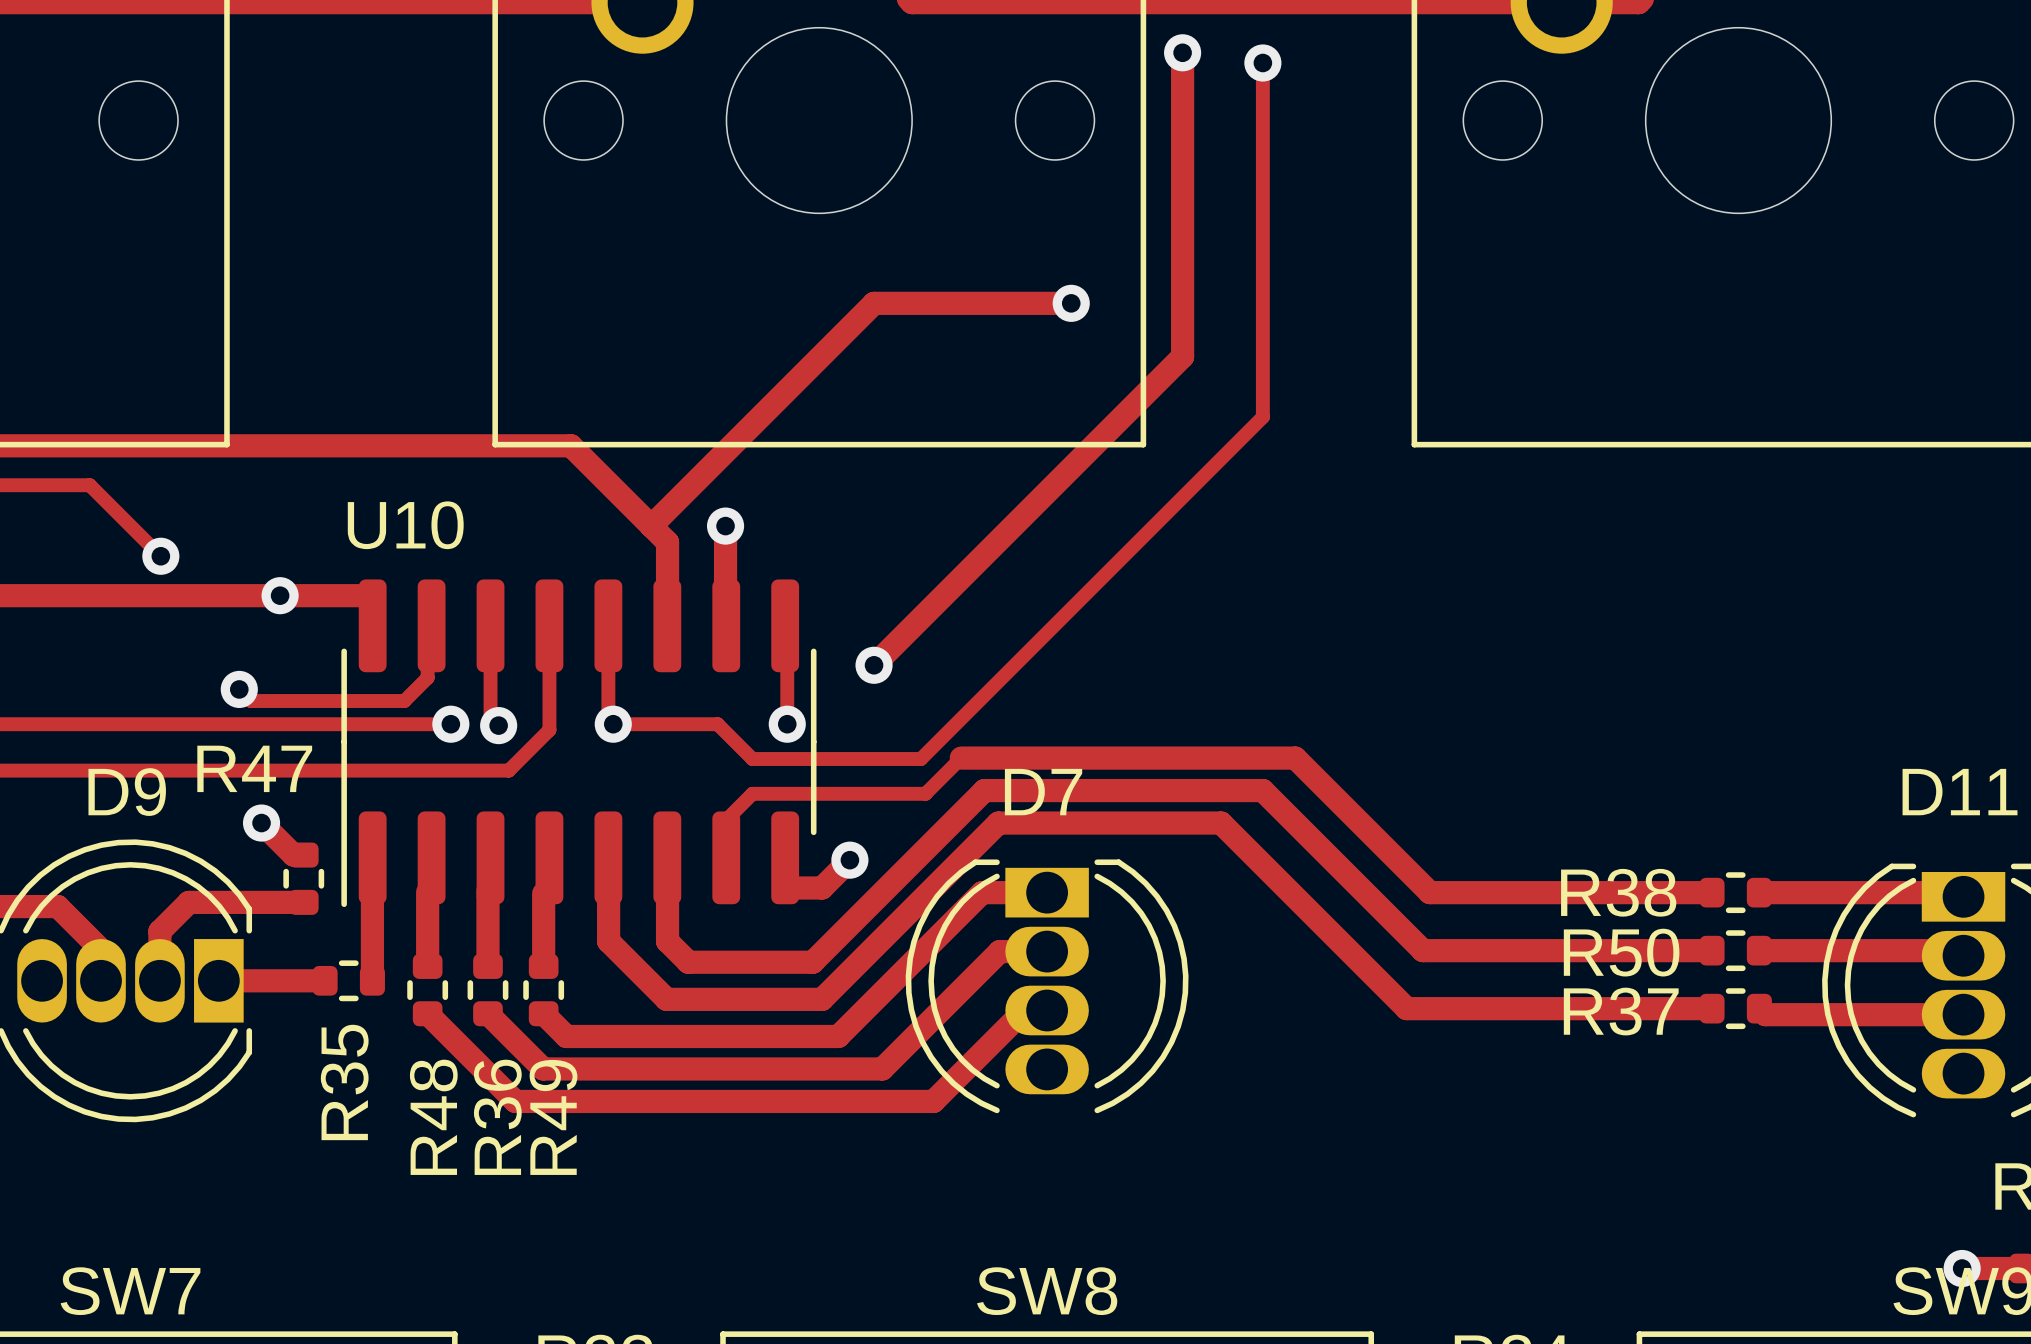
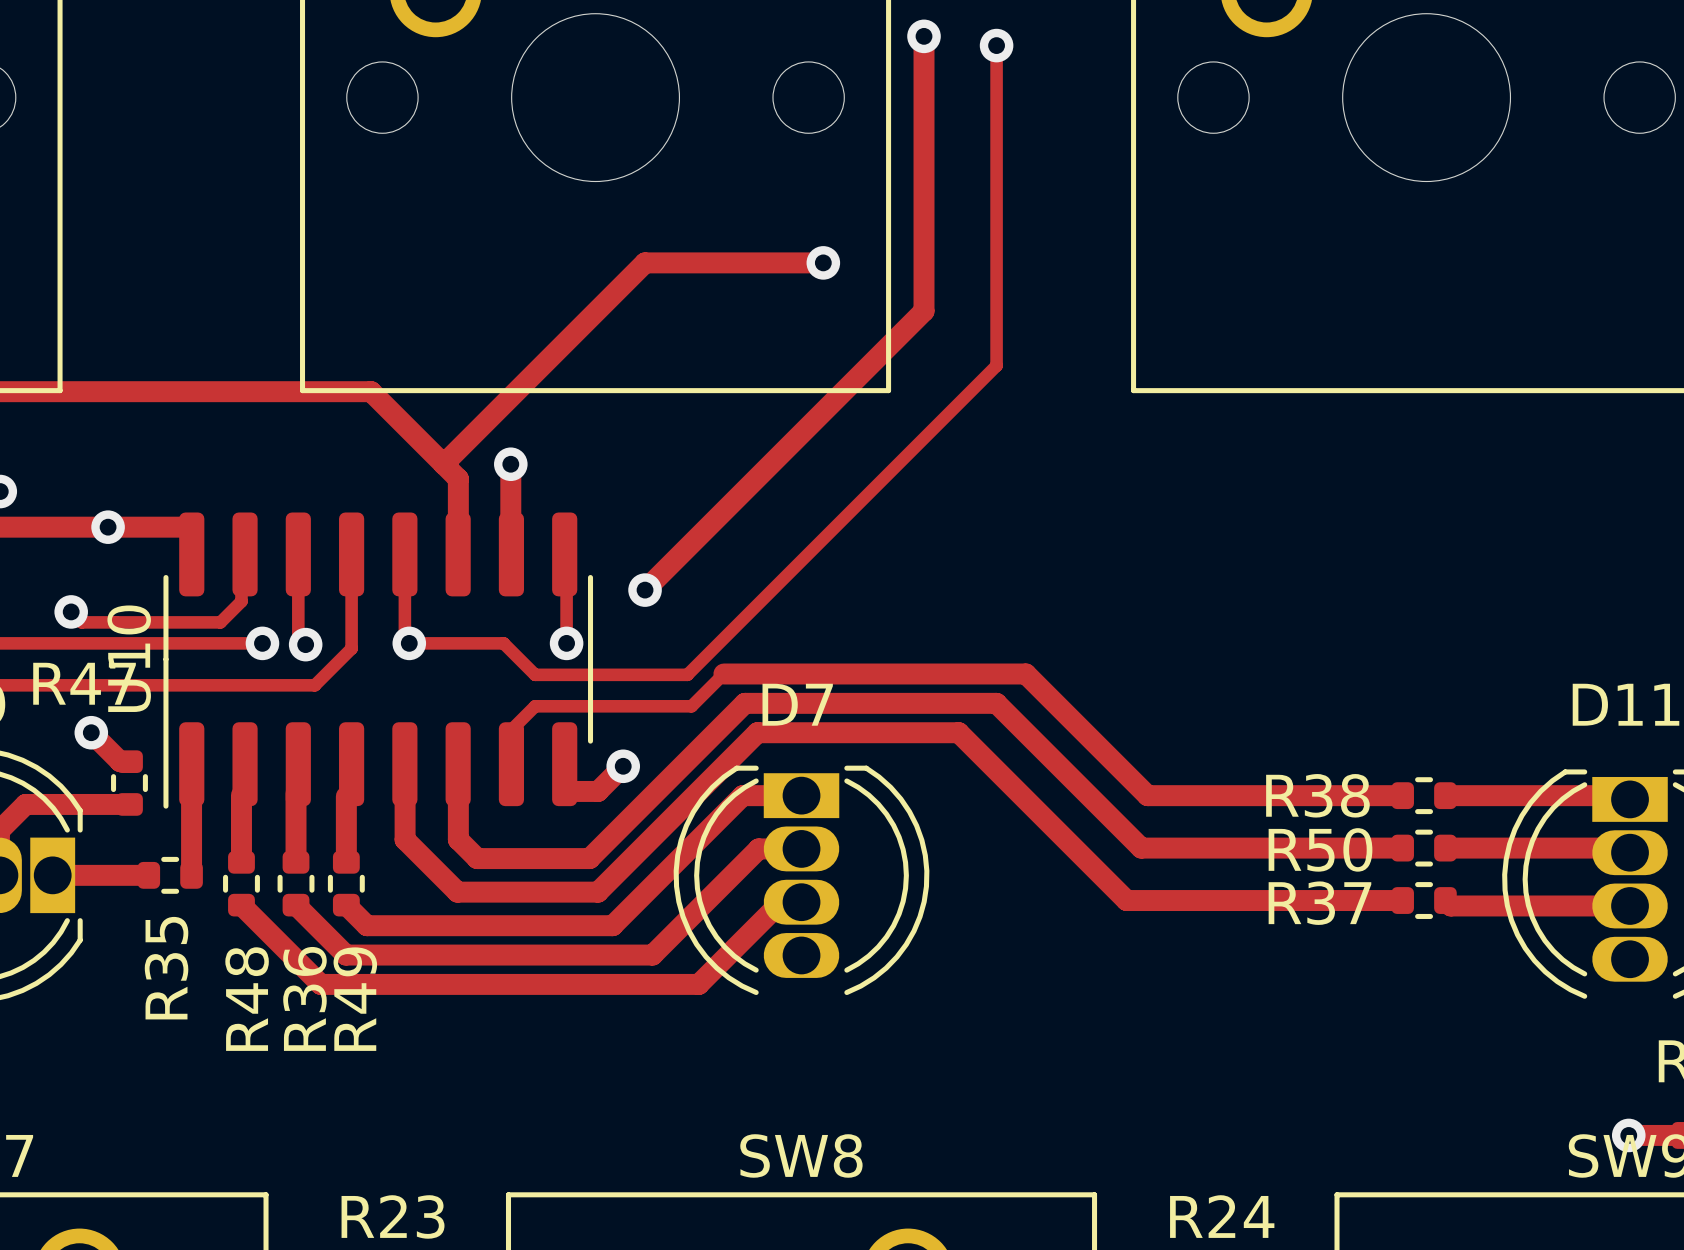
U10 name rotation: 0° (405, 525) -> 90° counterclockwise (129, 658)
U10 name position: U10 (405, 525) -> U10 (129, 658)

